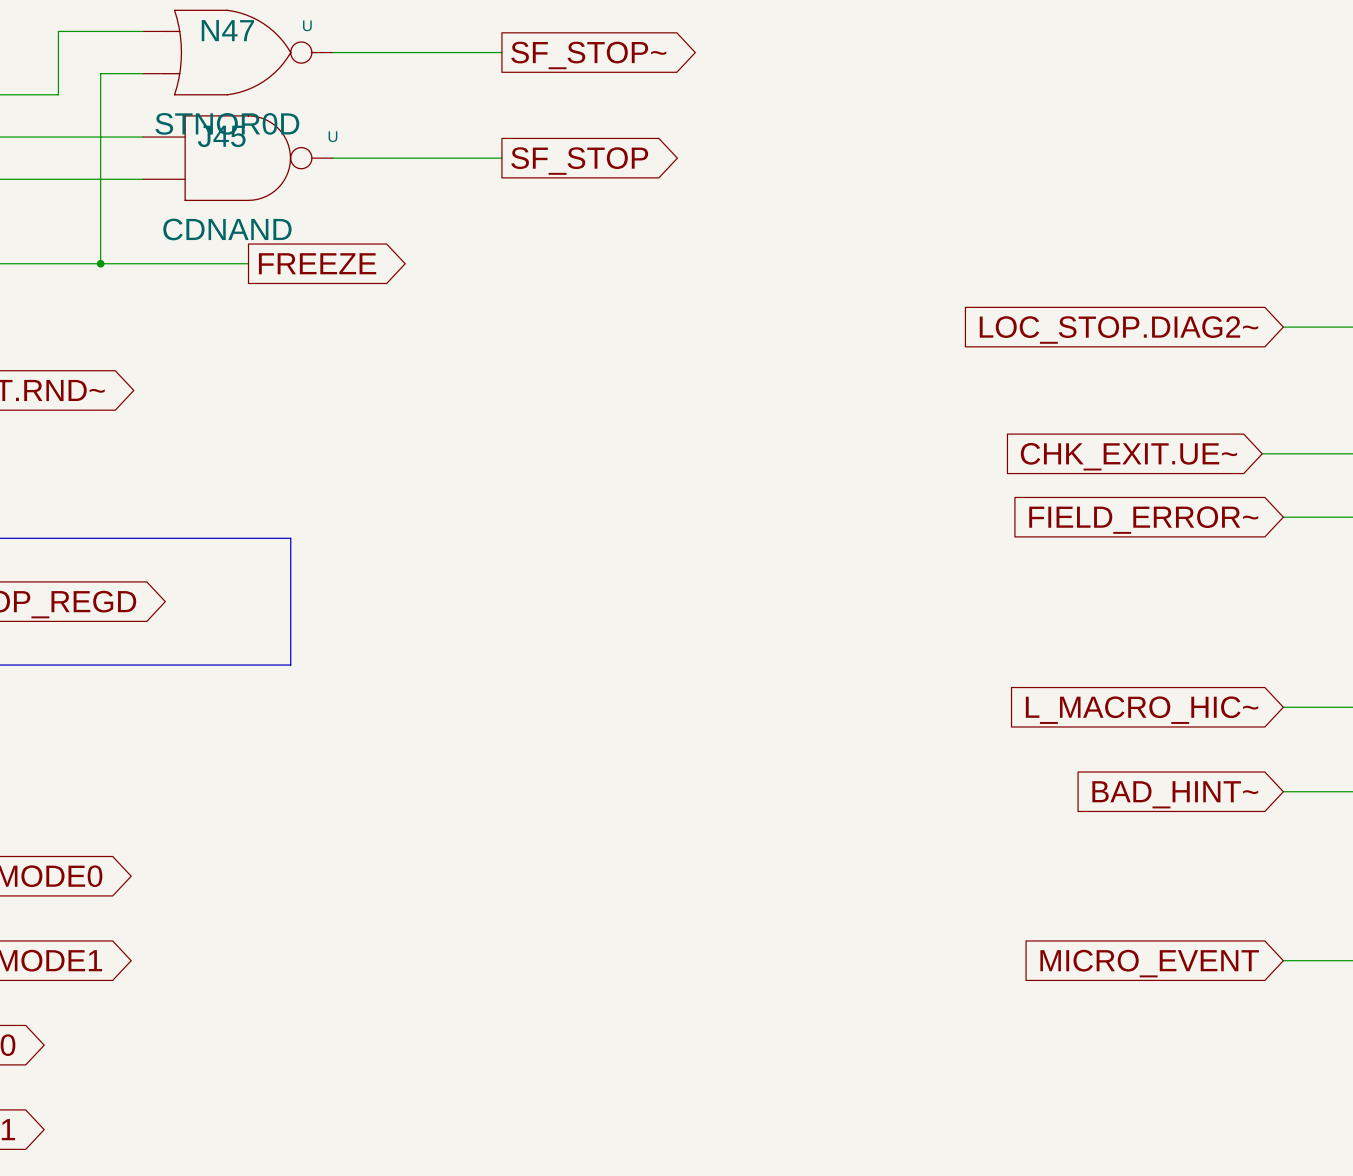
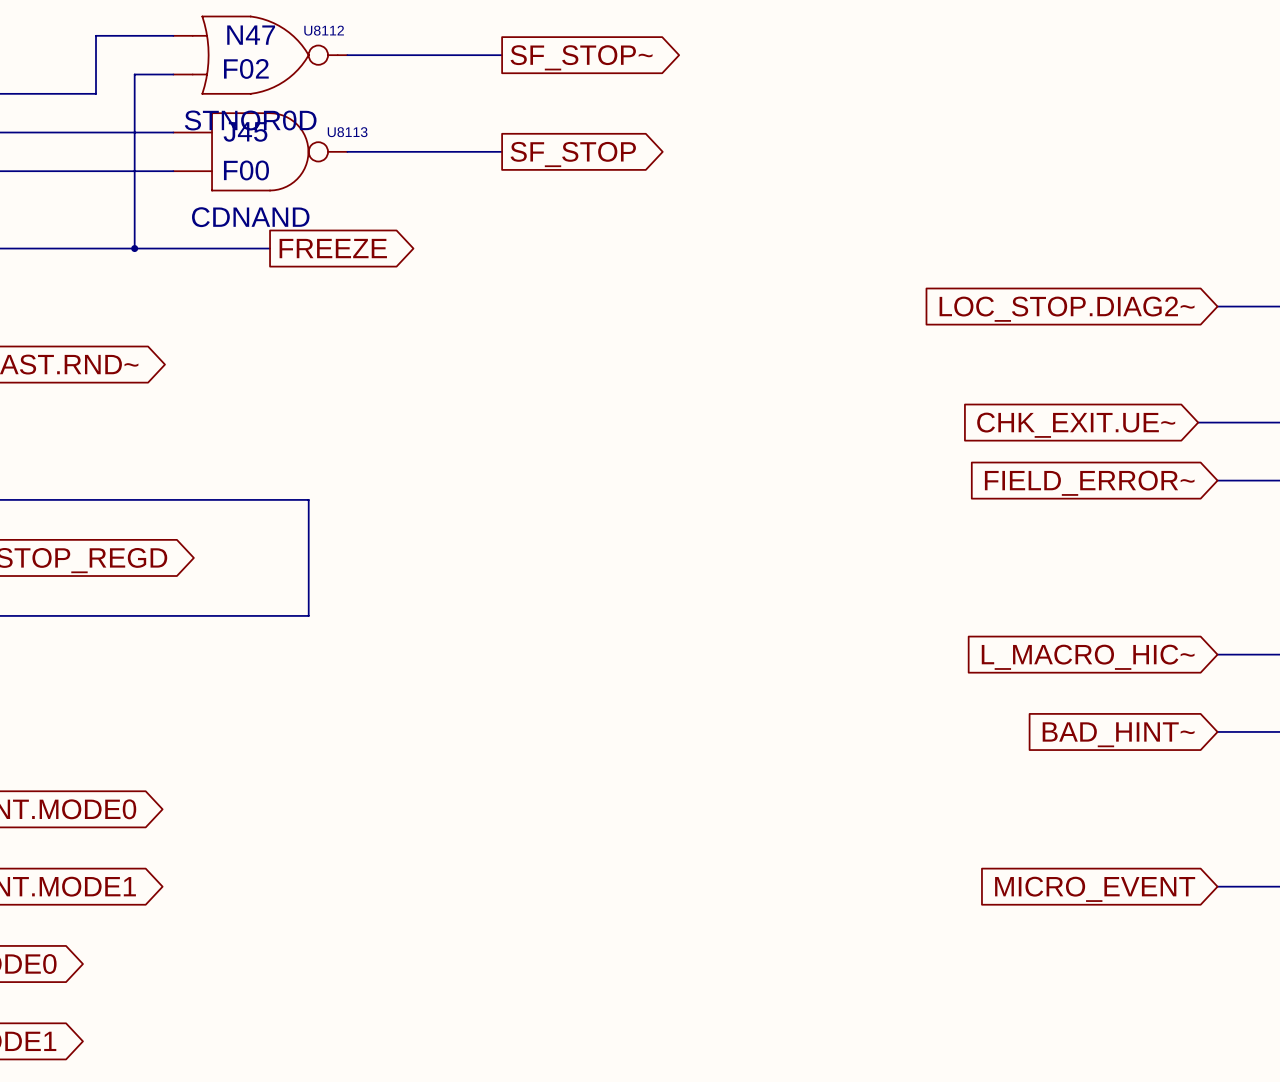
U name: U (307, 25) -> U8112 (324, 30)
U value: none -> F02 (246, 68)
U name: U (332, 136) -> U8113 (347, 132)
U value: none -> F00 (246, 170)

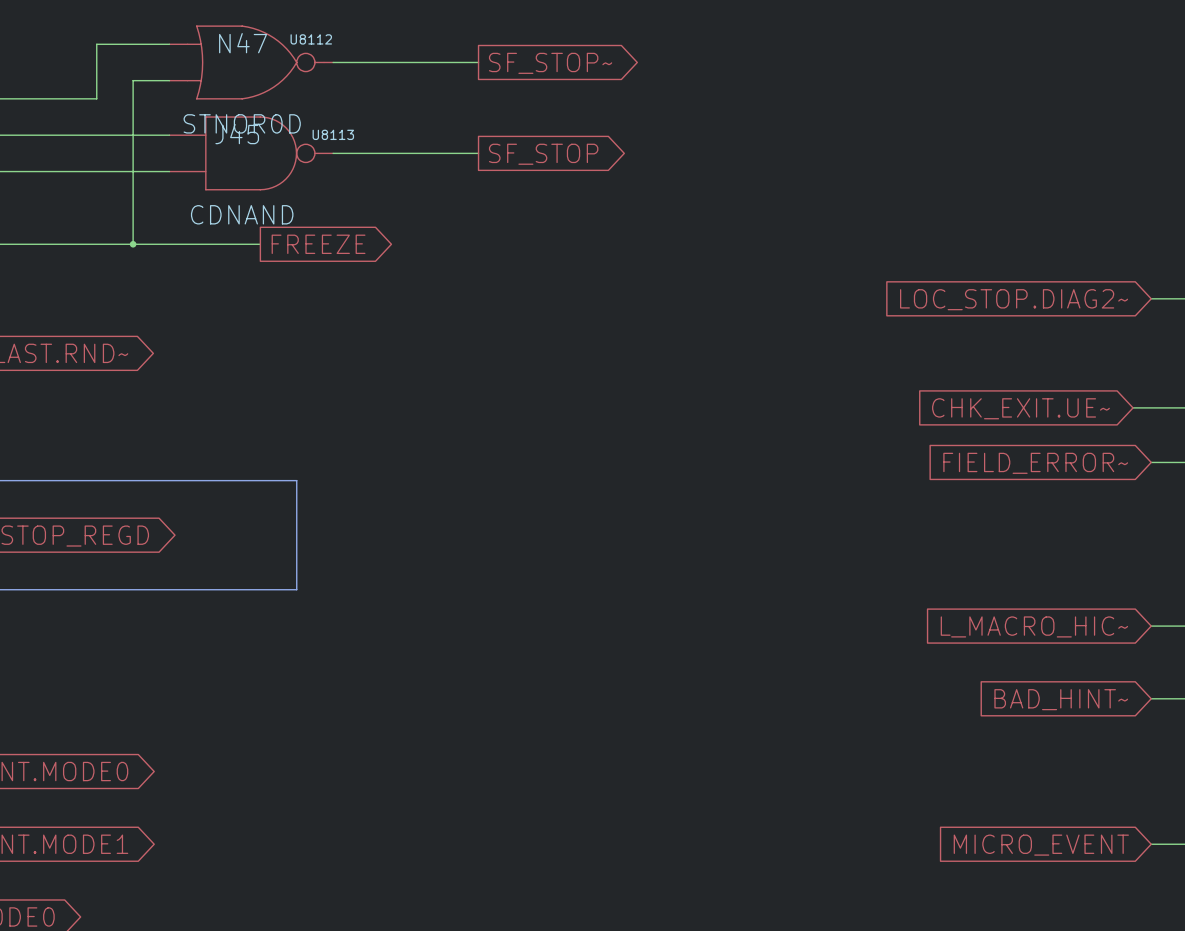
U8112 value: F02 (246, 68) -> none
U8113 value: F00 (246, 170) -> none

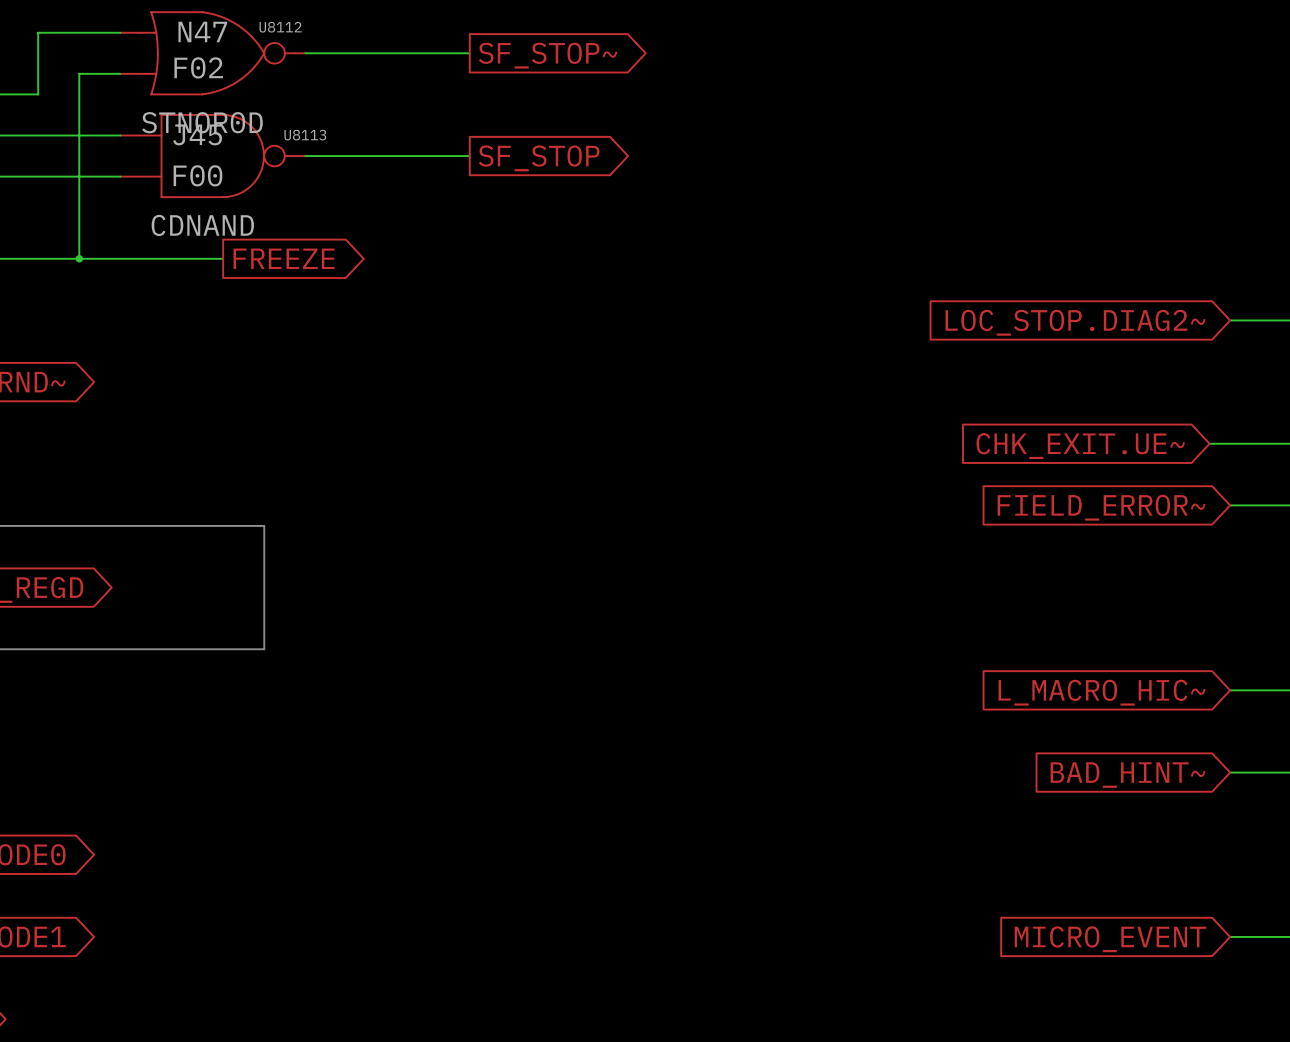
U8112 value: none -> F02 (198, 67)
U8113 value: none -> F00 (197, 175)

